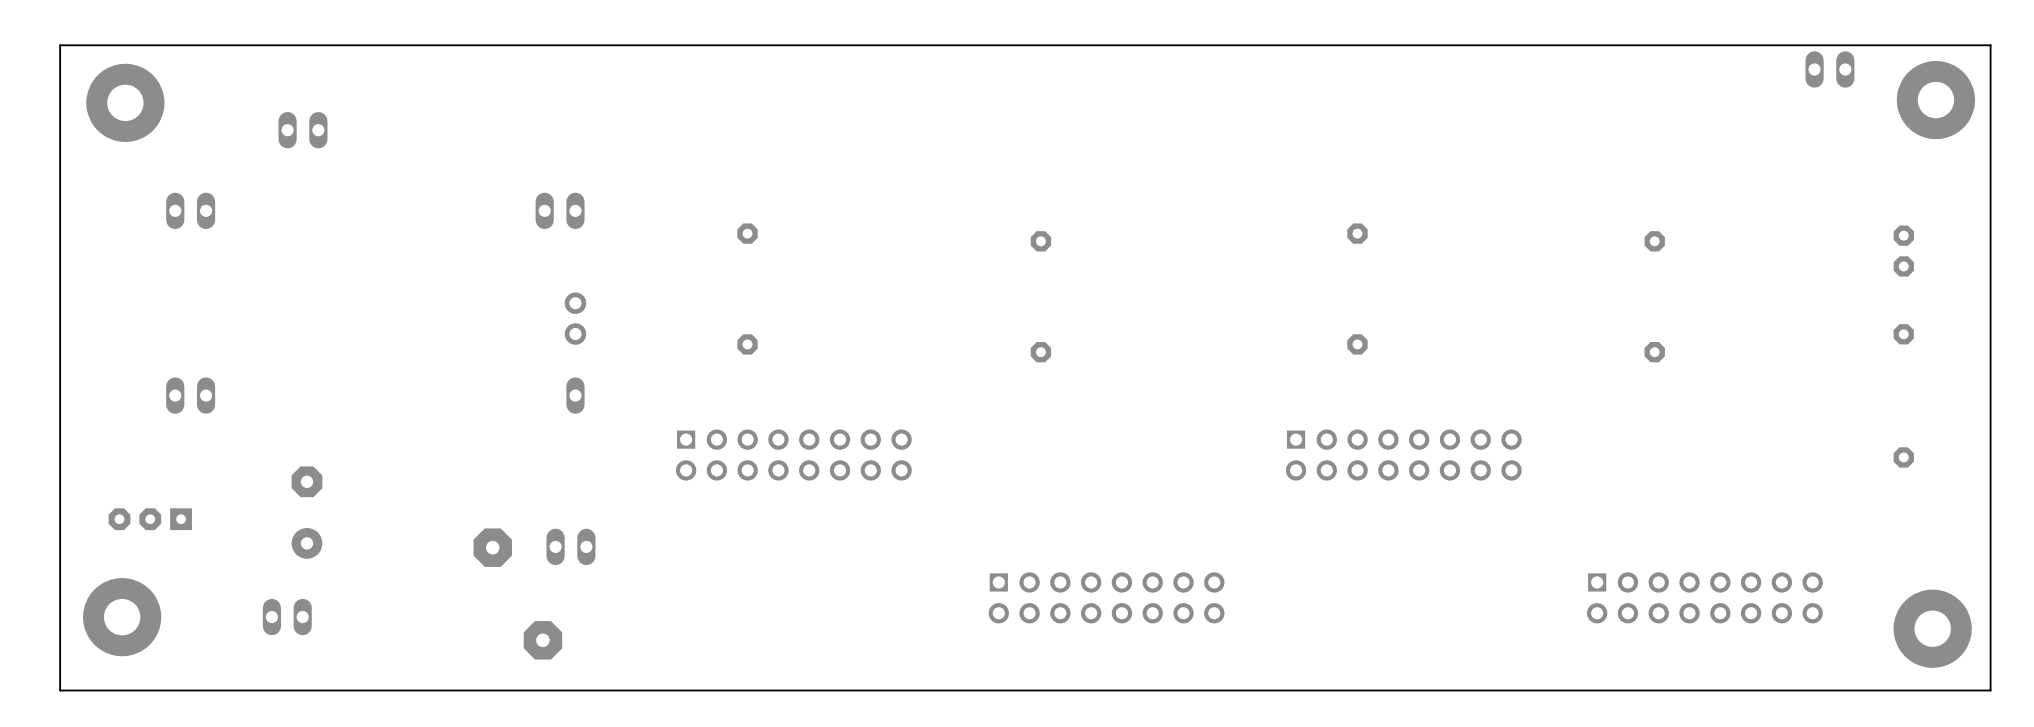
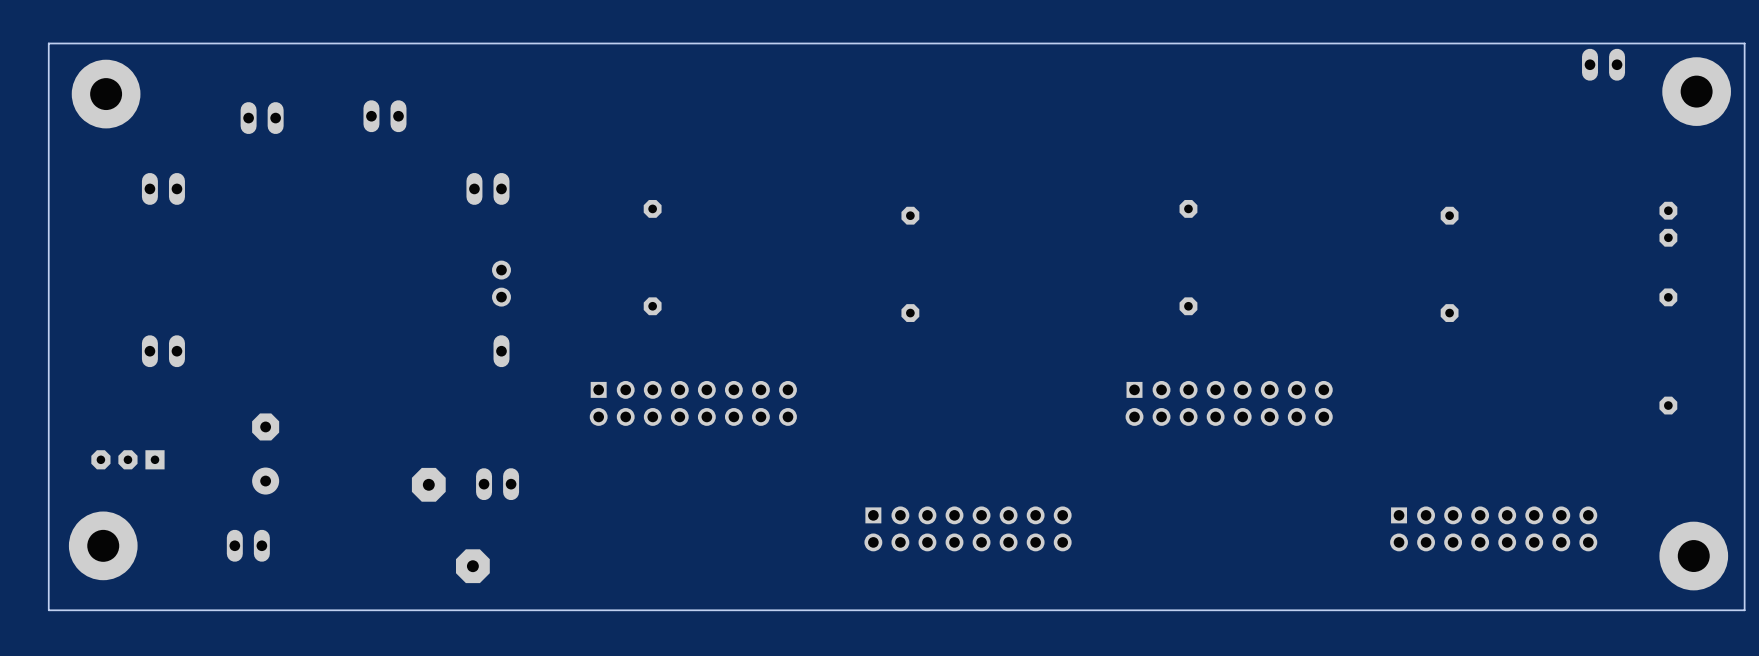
part: none -> (384, 116)

